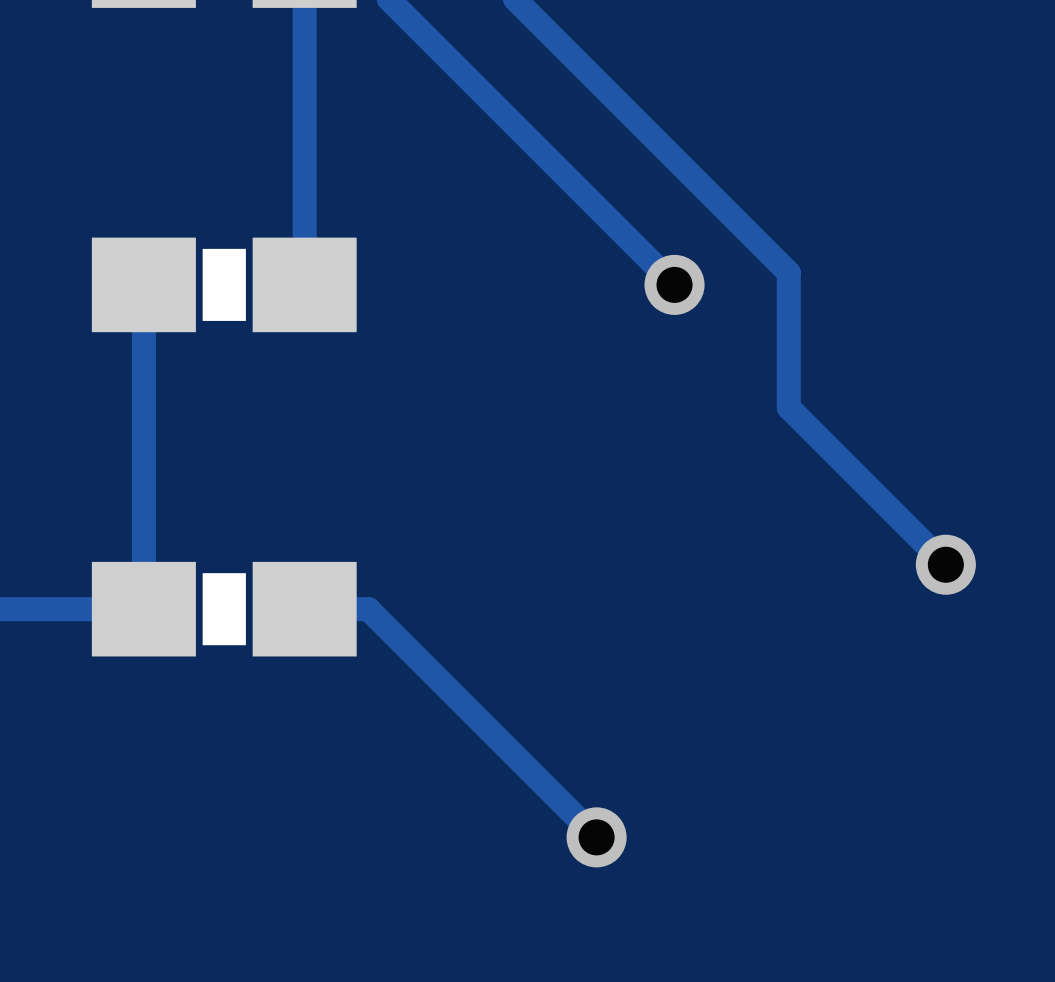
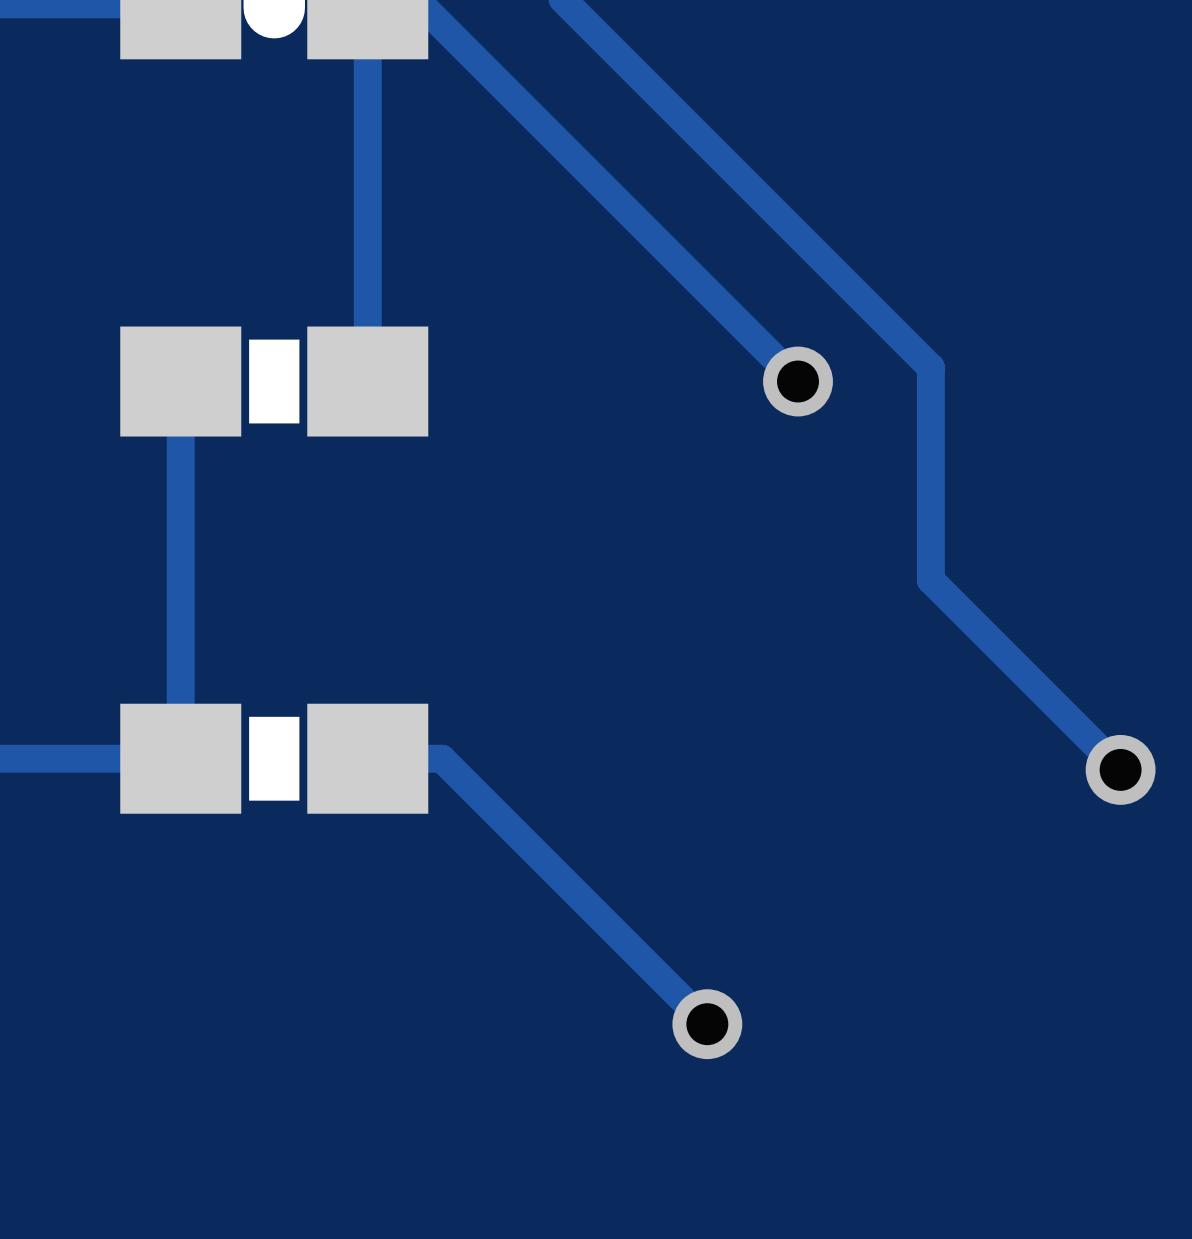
track: (788, 407) (945, 564) -> (930, 524) (930, 580) (1120, 769)
via position: (945, 564) -> (1120, 769)

